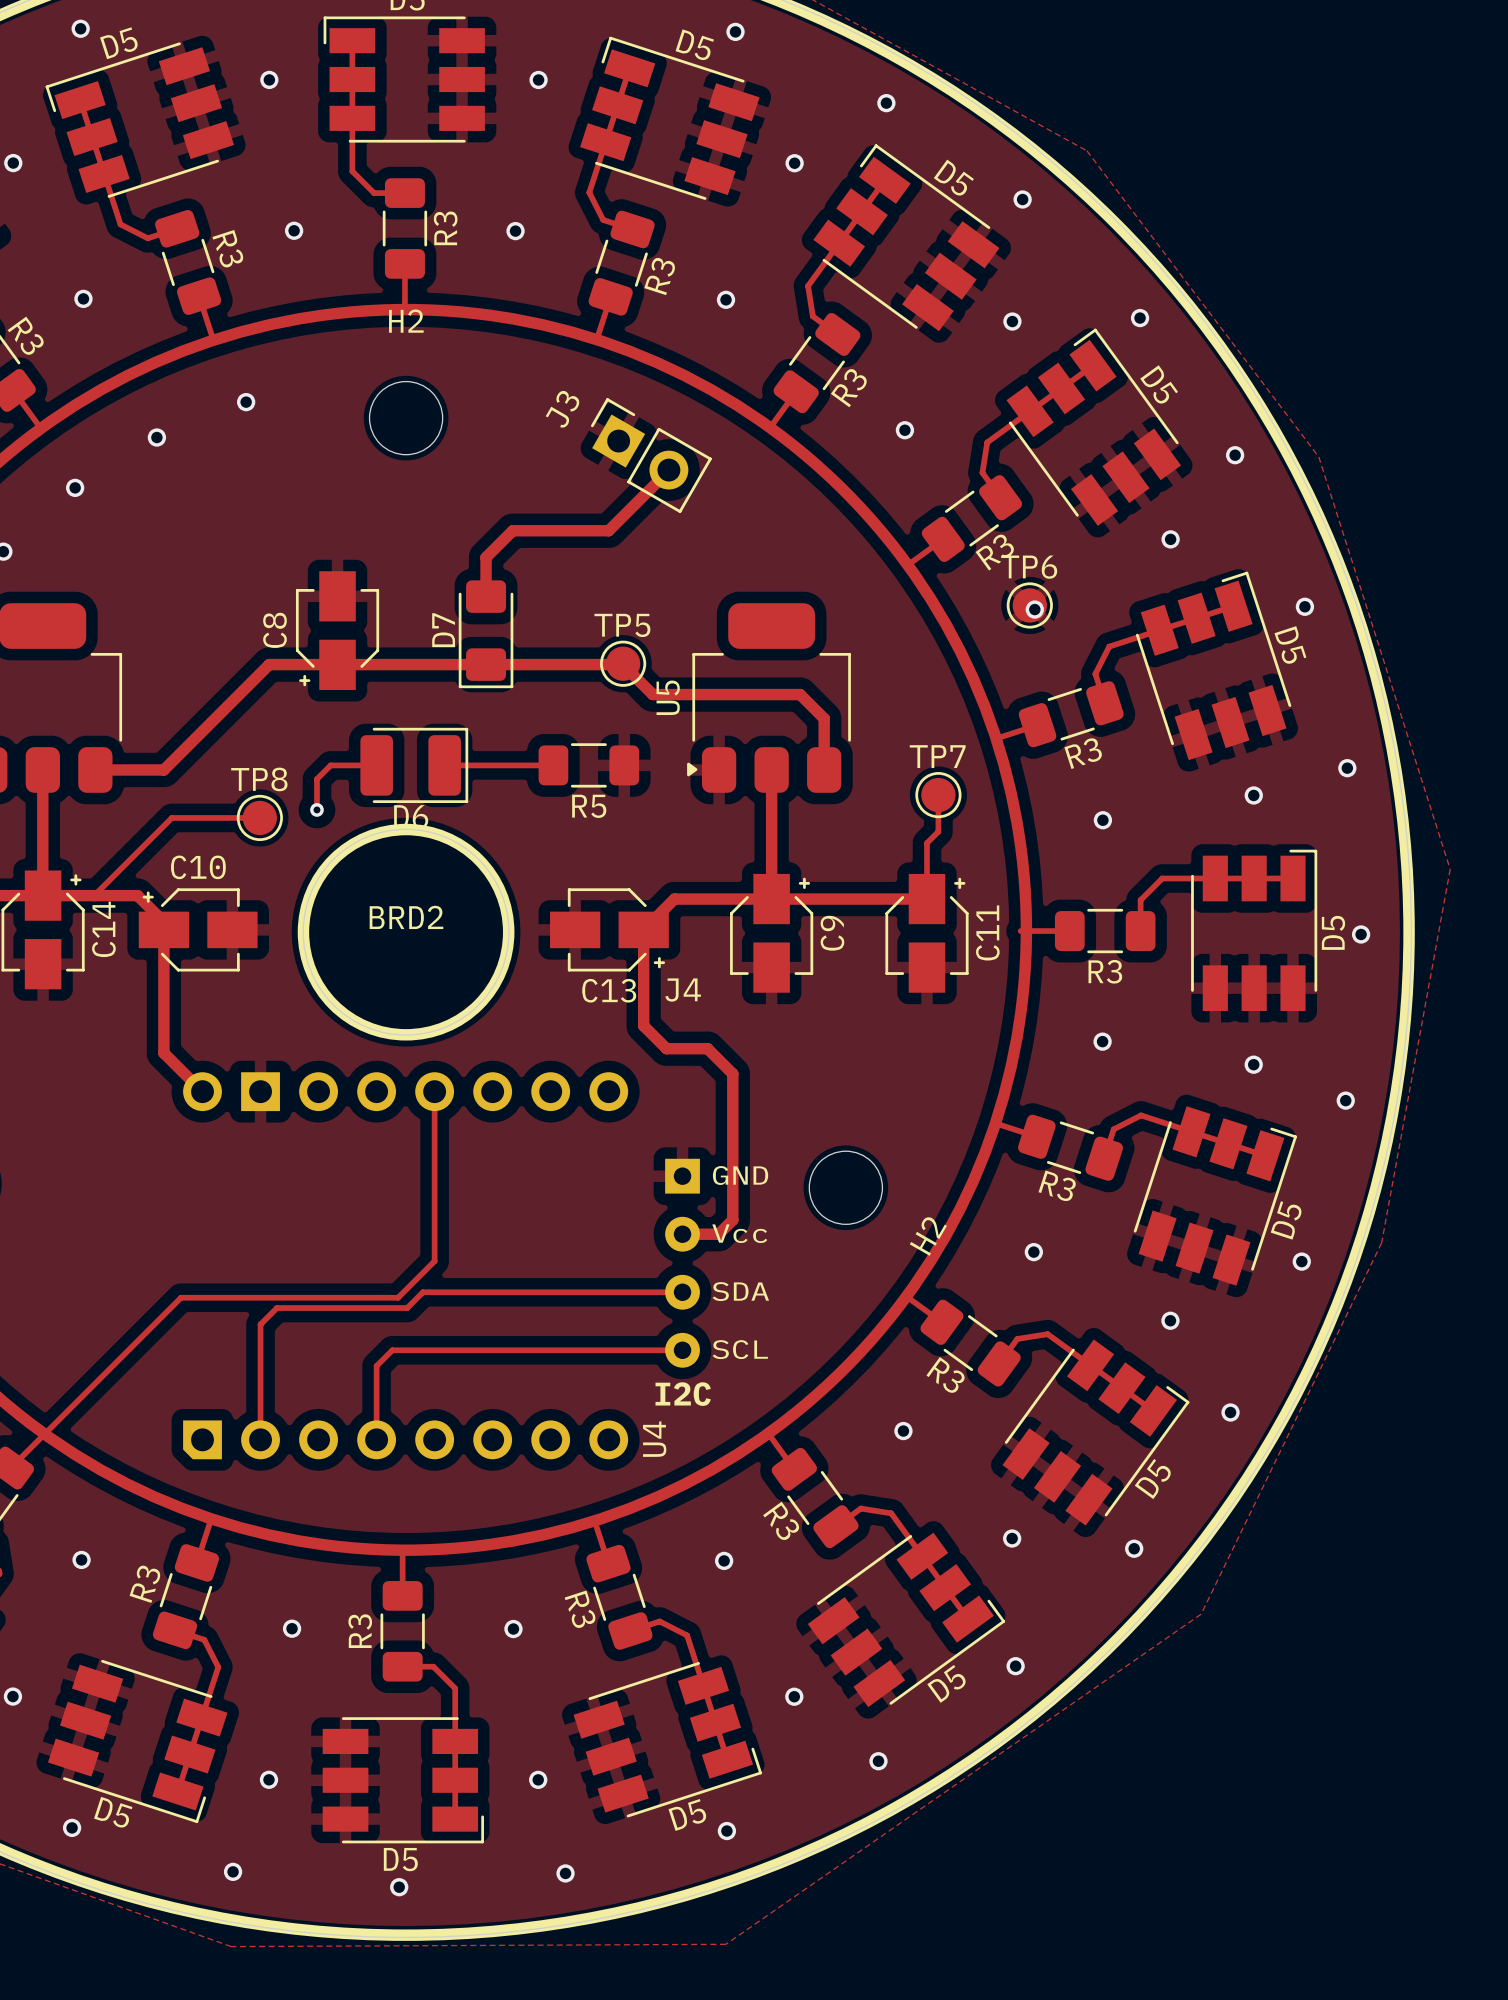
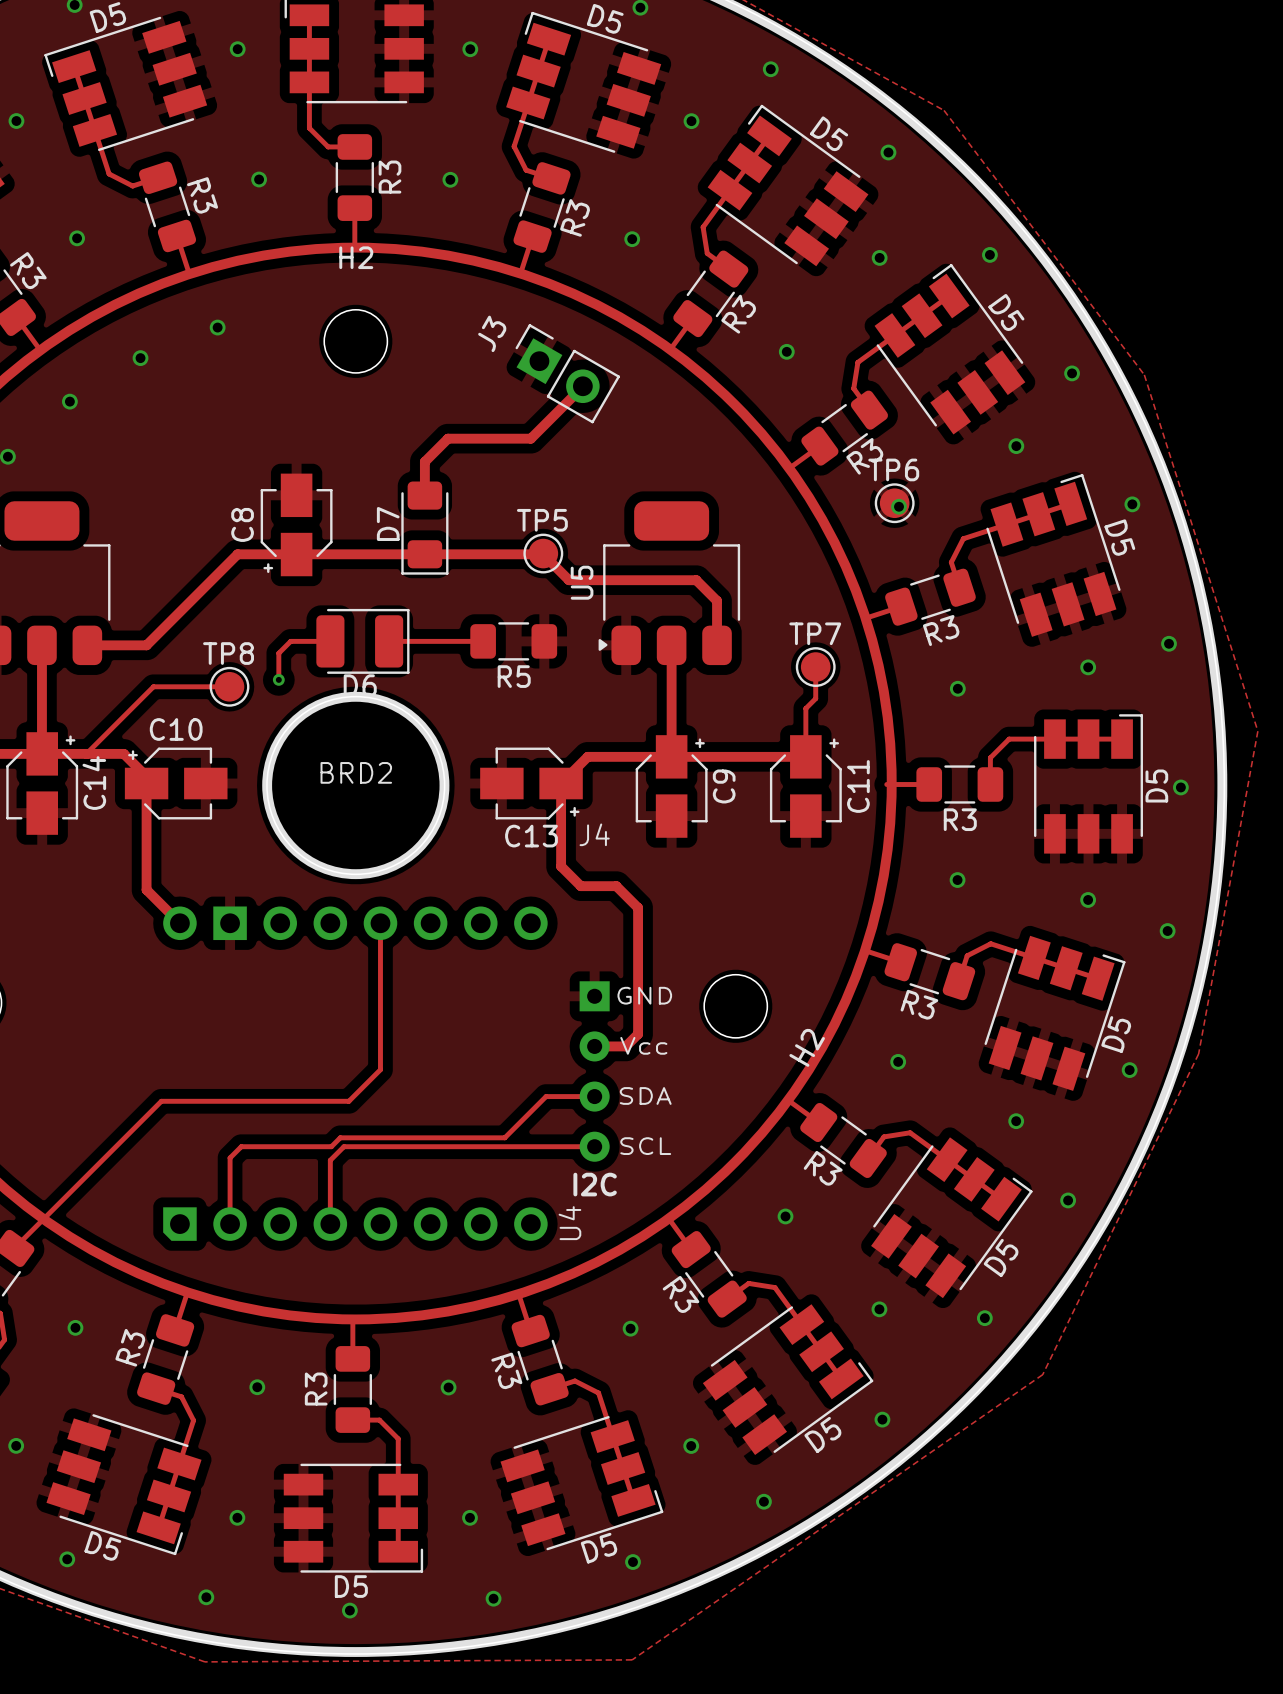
track: (626, 1292) (422, 1292) (407, 1308) (276, 1308) (260, 1324) (260, 1363) -> (546, 1096) (504, 1137) (340, 1137) (331, 1146) (241, 1146) (230, 1157)

